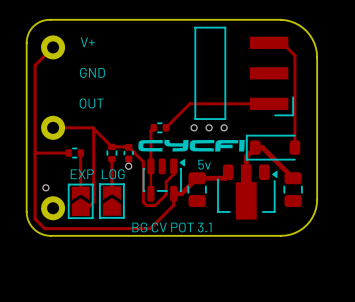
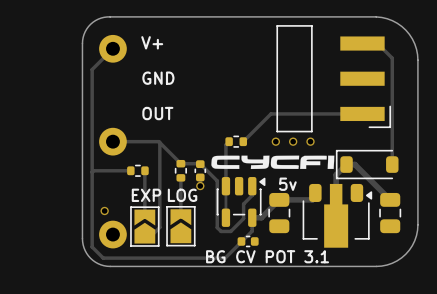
part: none -> (248, 241)

